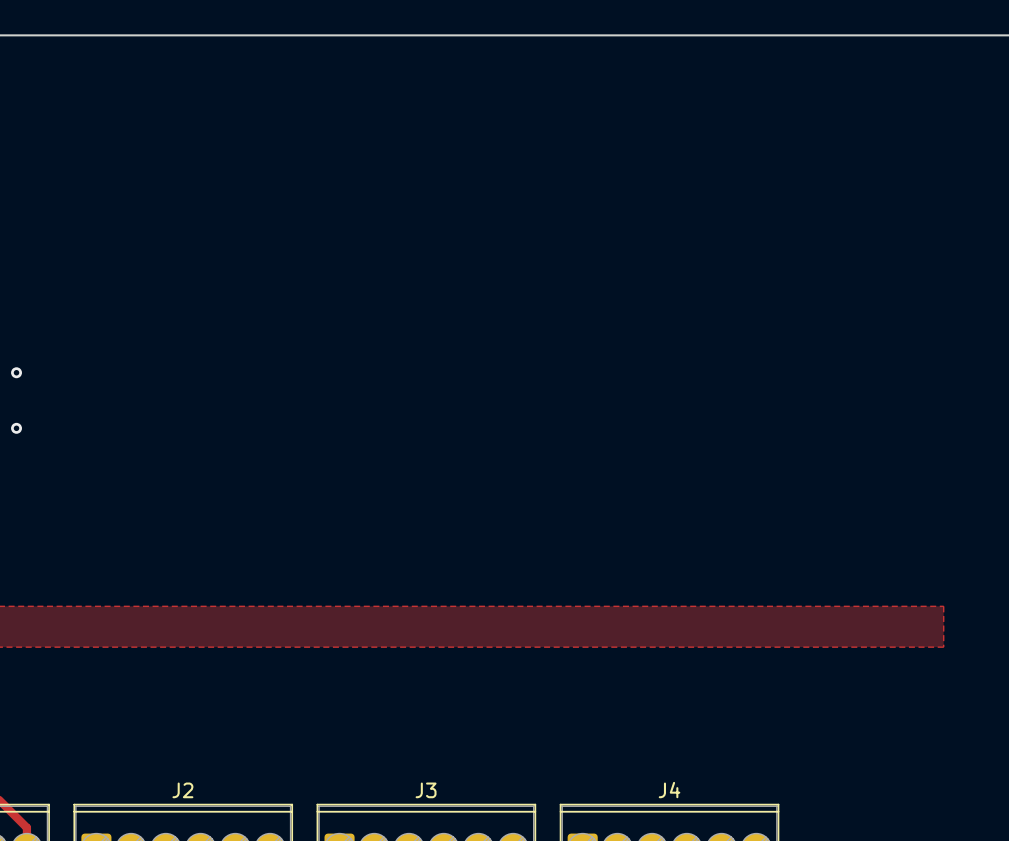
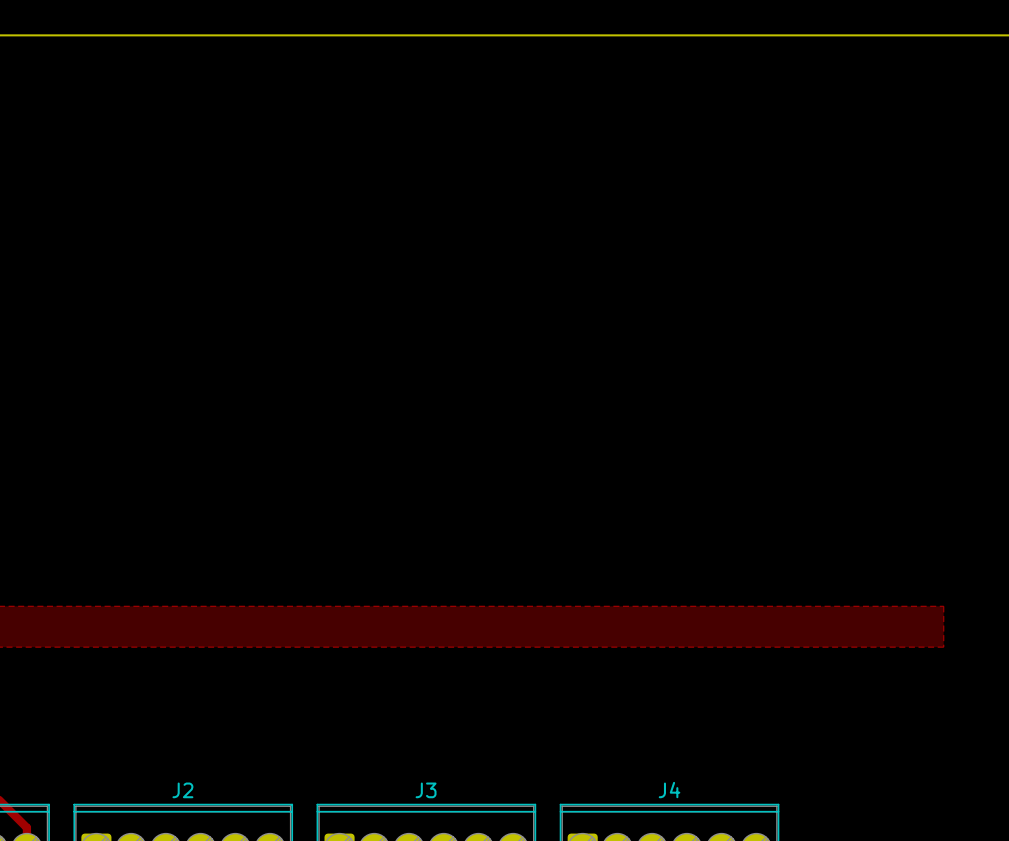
via: (16, 372) -> none
via: (16, 428) -> none

